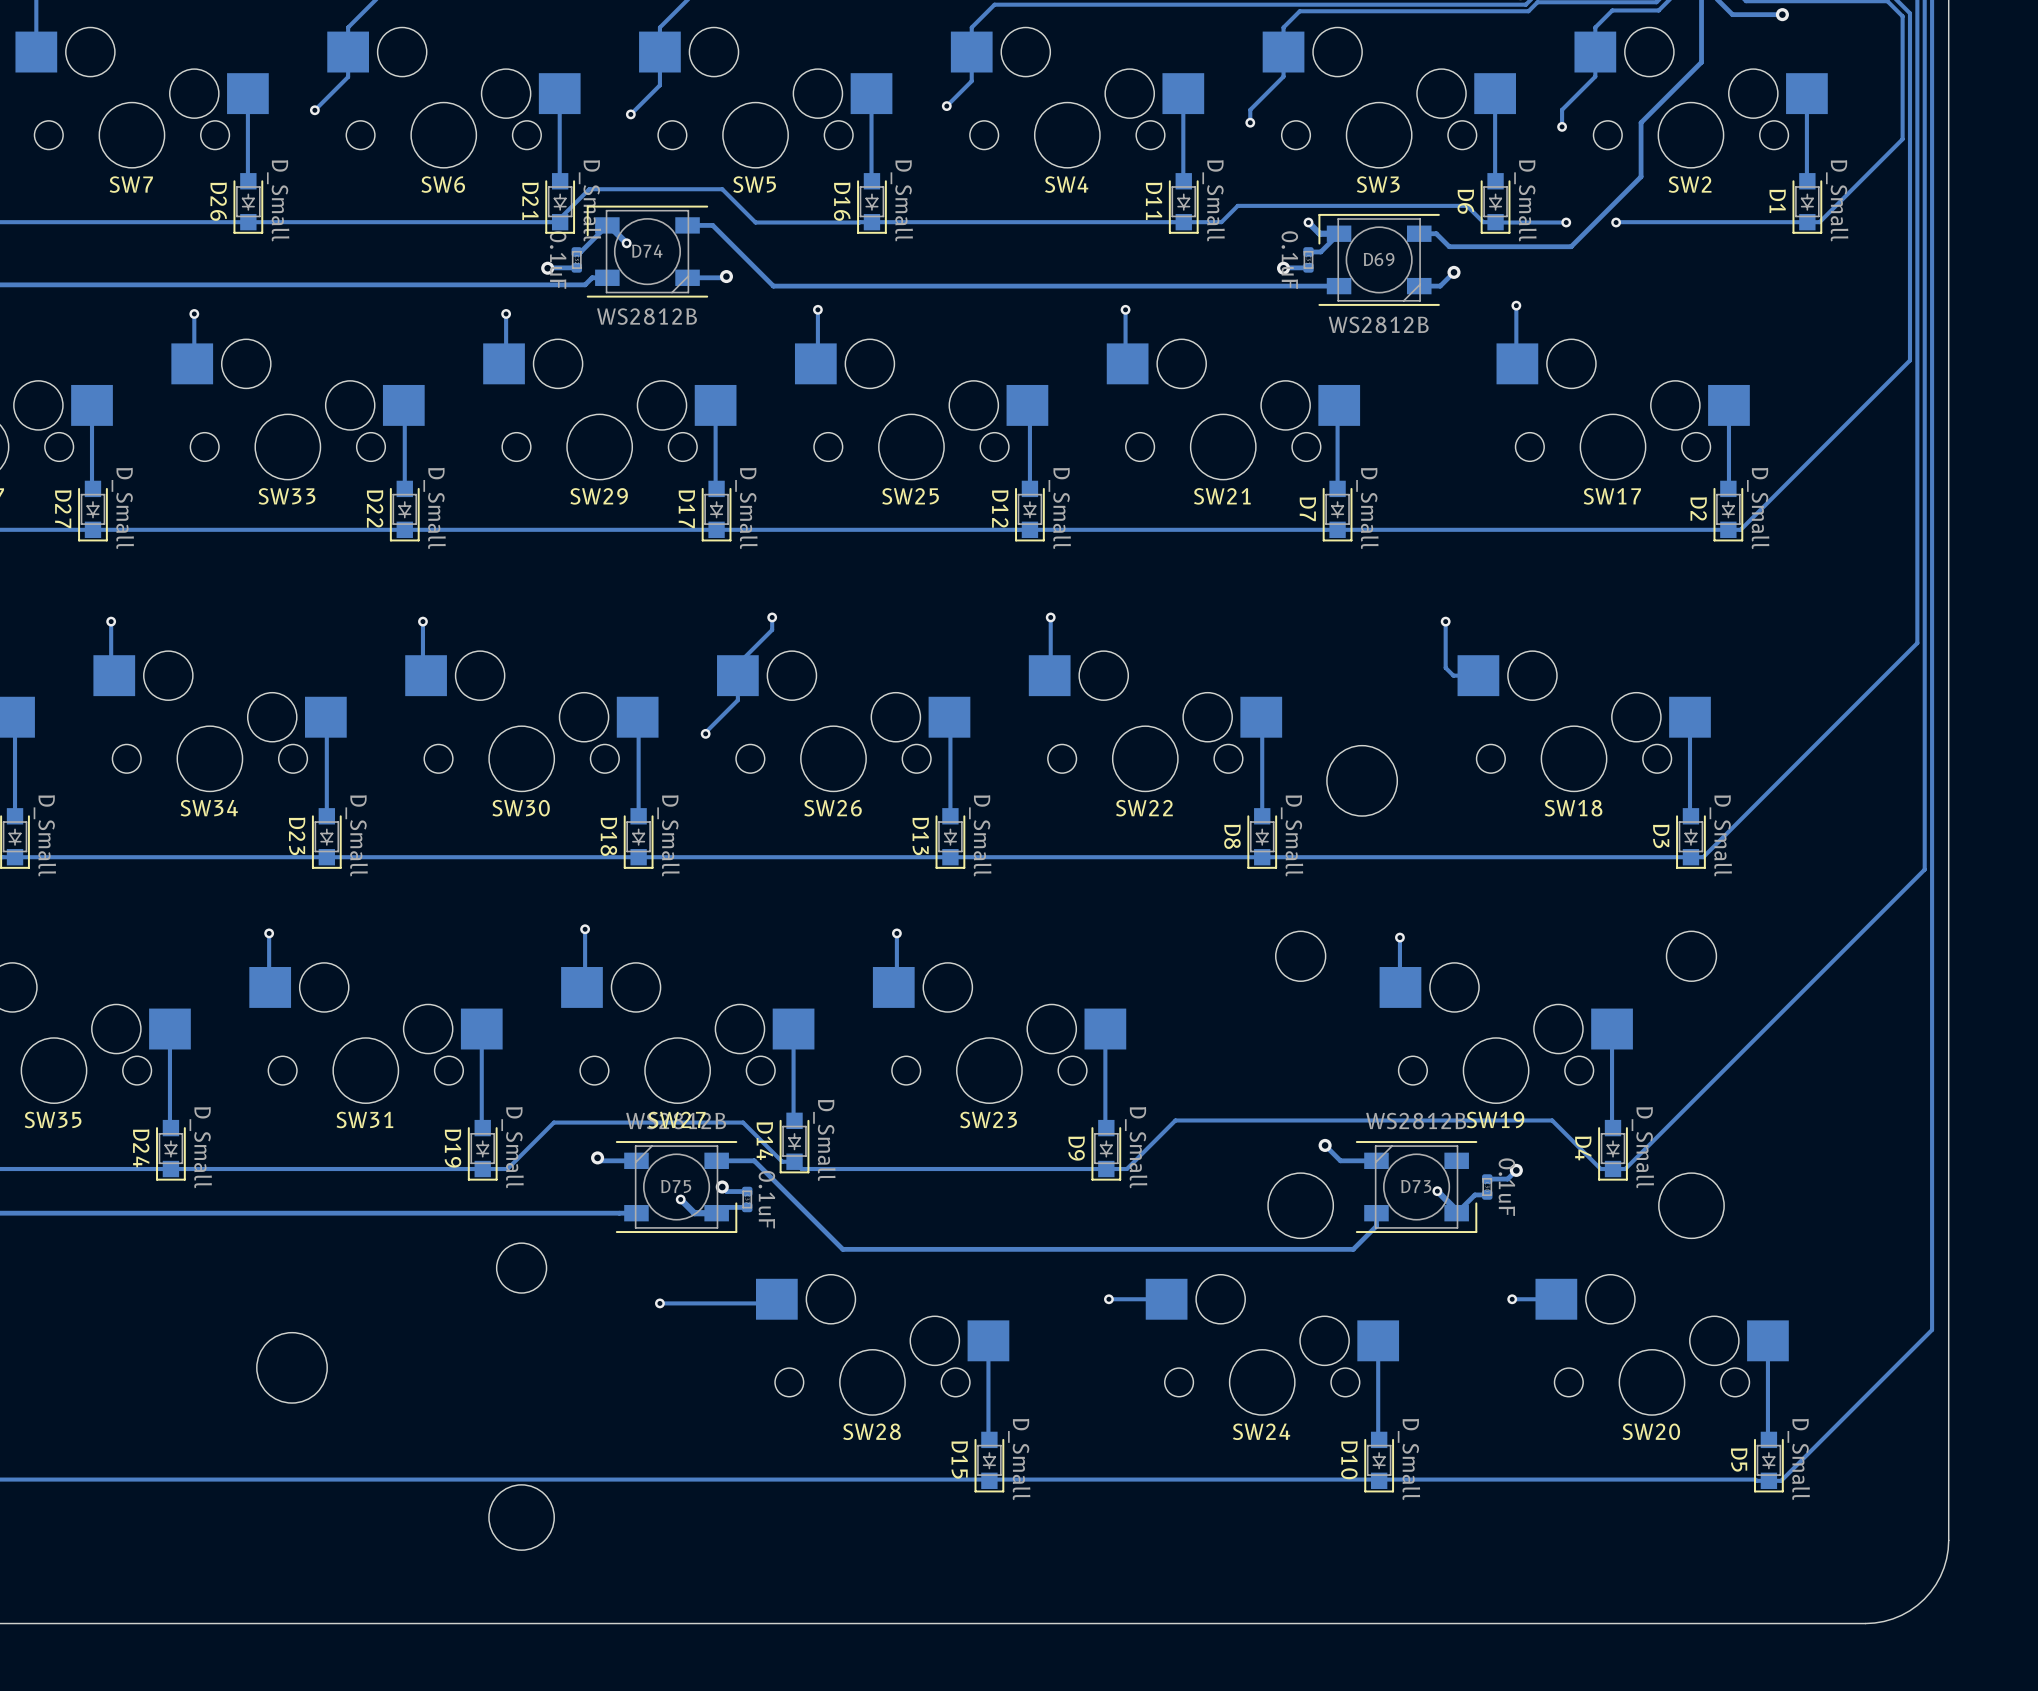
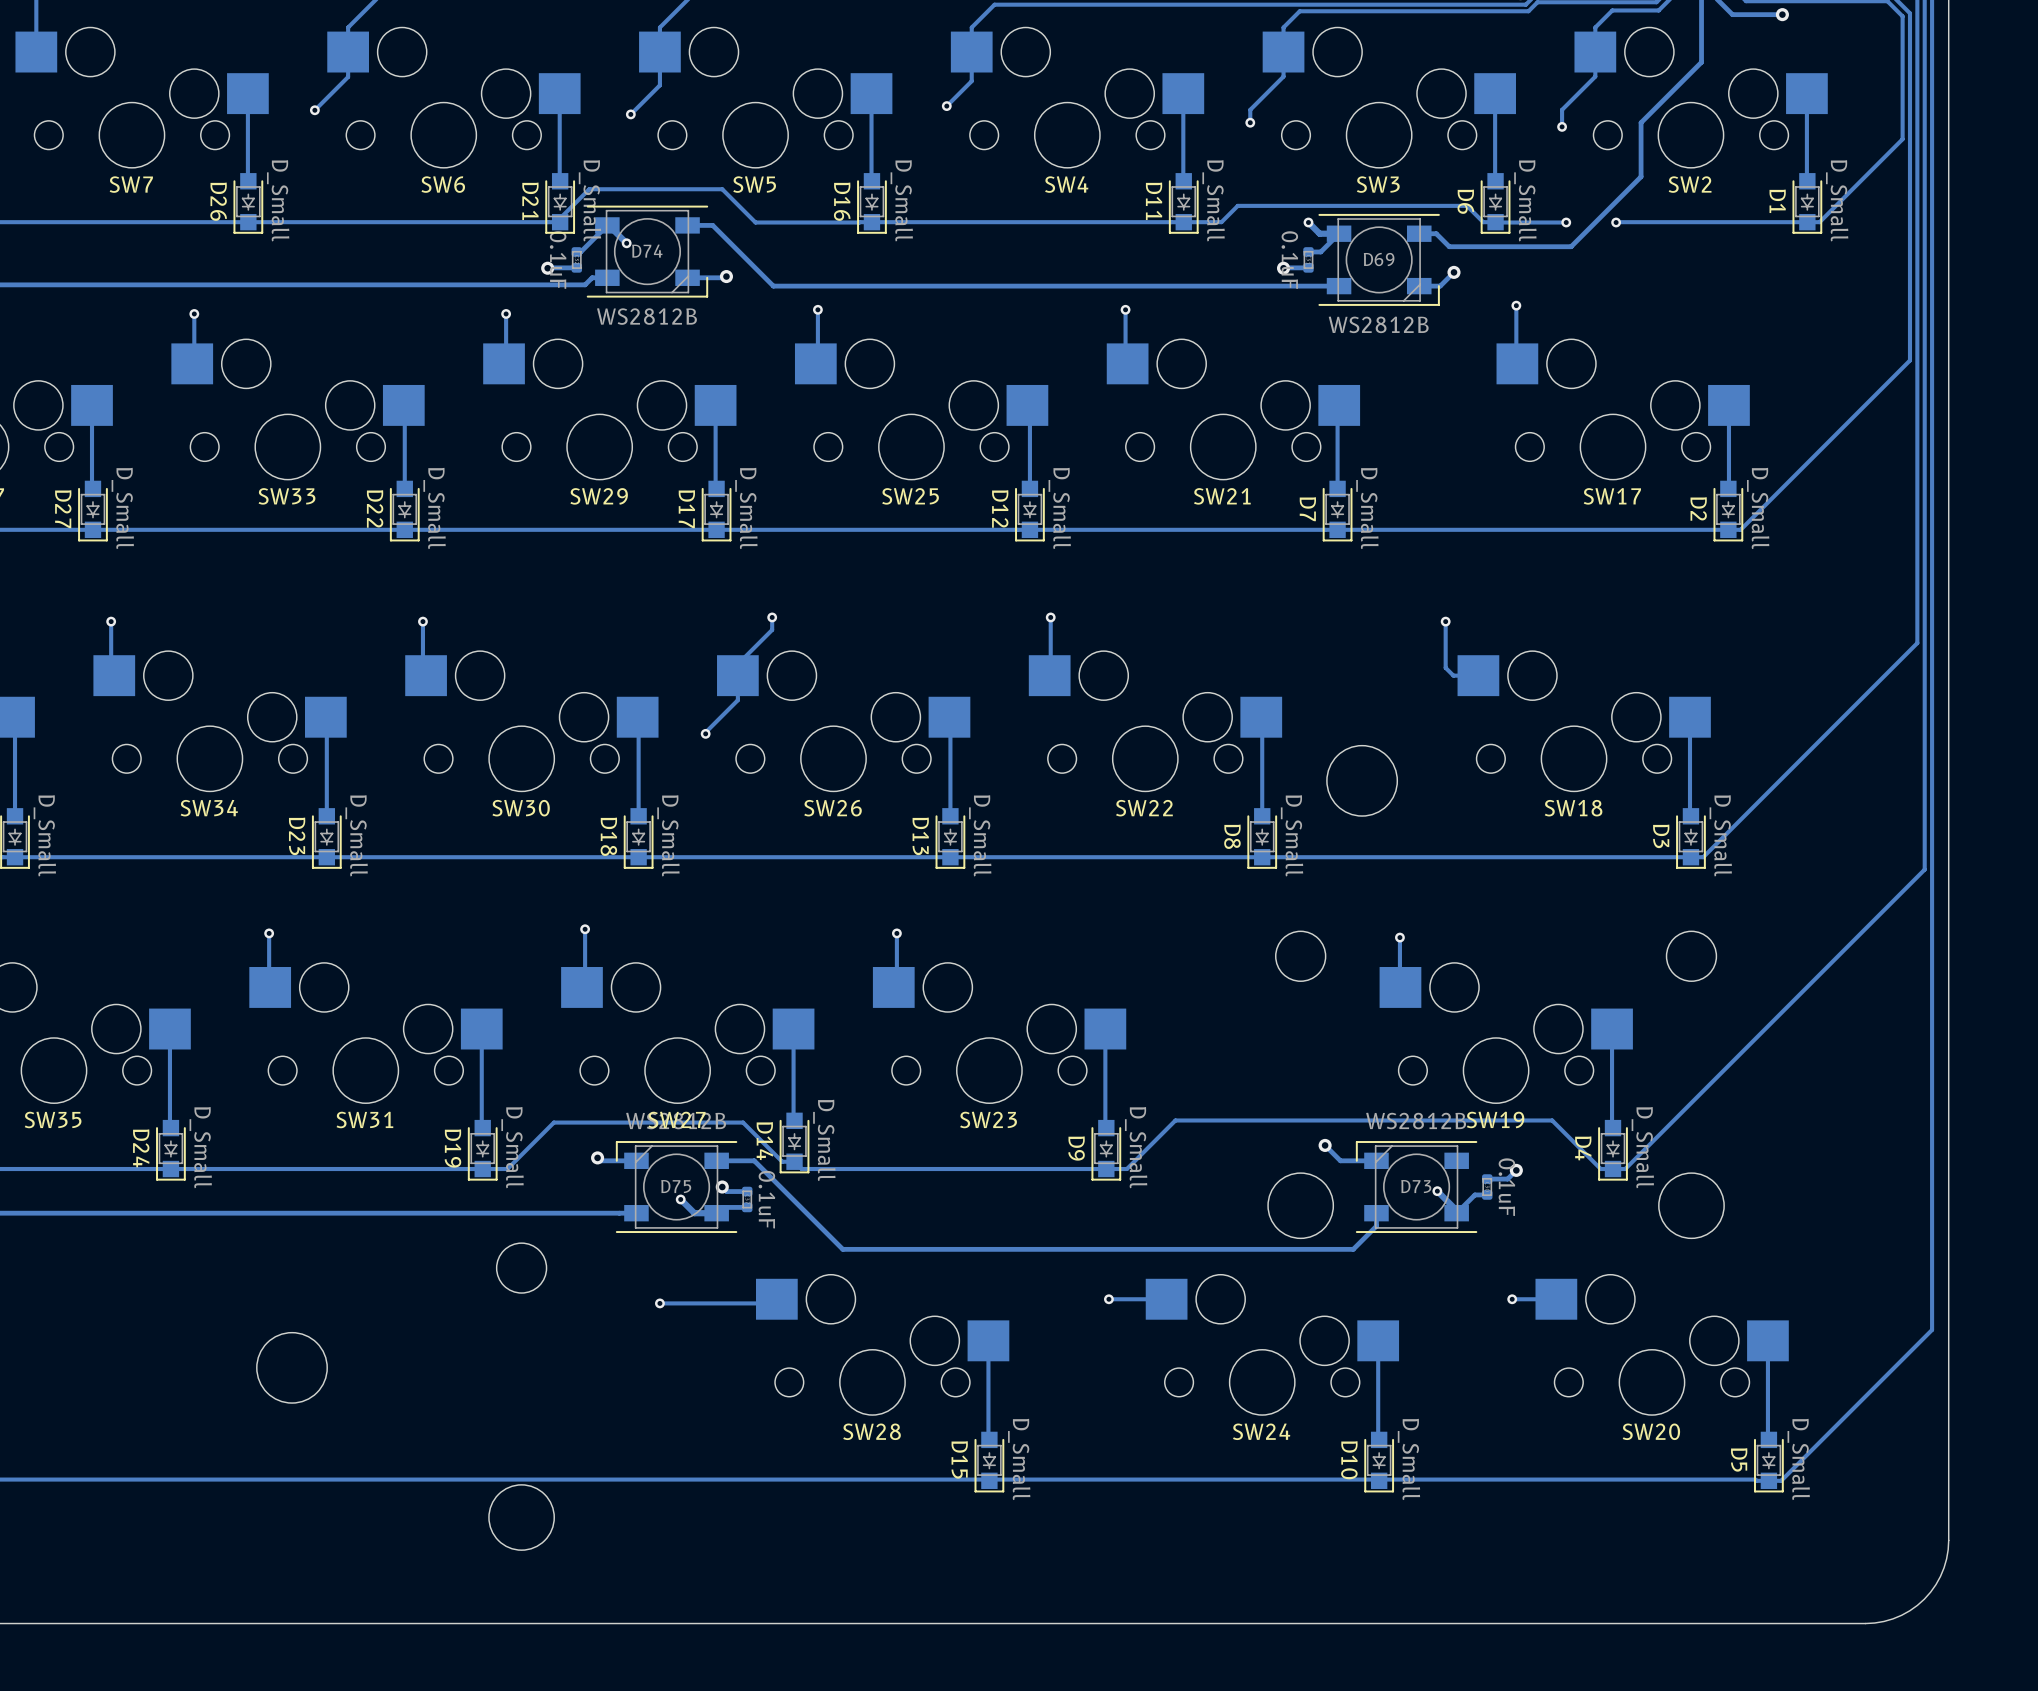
D74 footprint: [586, 205, 709, 298] -> [586, 205, 709, 298]
D69 footprint: [1318, 213, 1440, 306] -> [1318, 213, 1440, 306]
D75 footprint: [615, 1141, 738, 1234] -> [615, 1141, 738, 1234]
D73 footprint: [1355, 1141, 1478, 1234] -> [1355, 1141, 1478, 1234]

